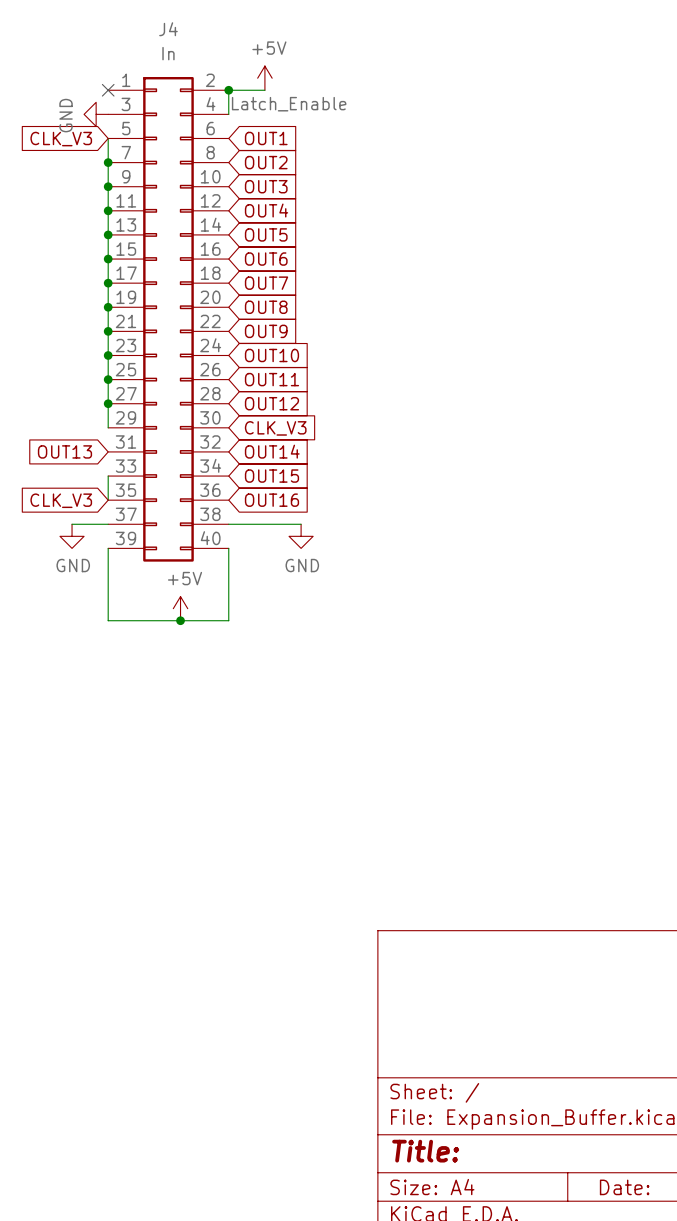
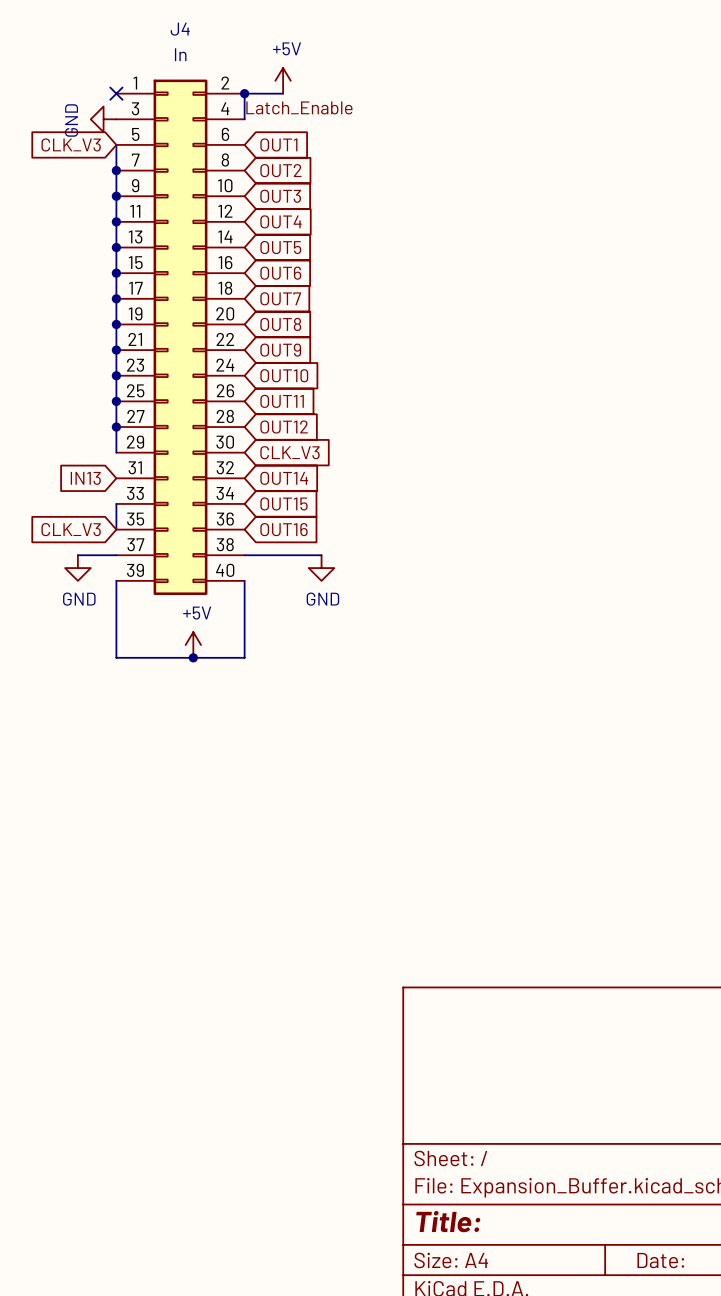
global label: OUT13 (64, 451) -> IN13 (85, 478)

